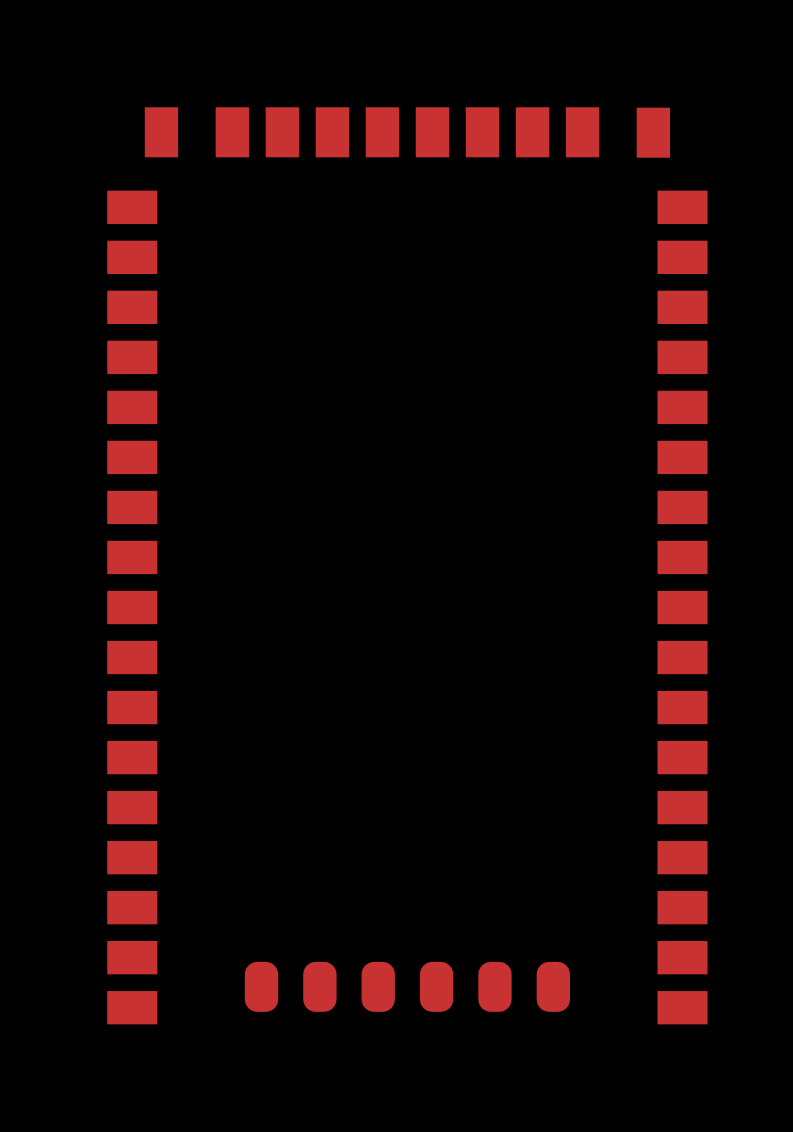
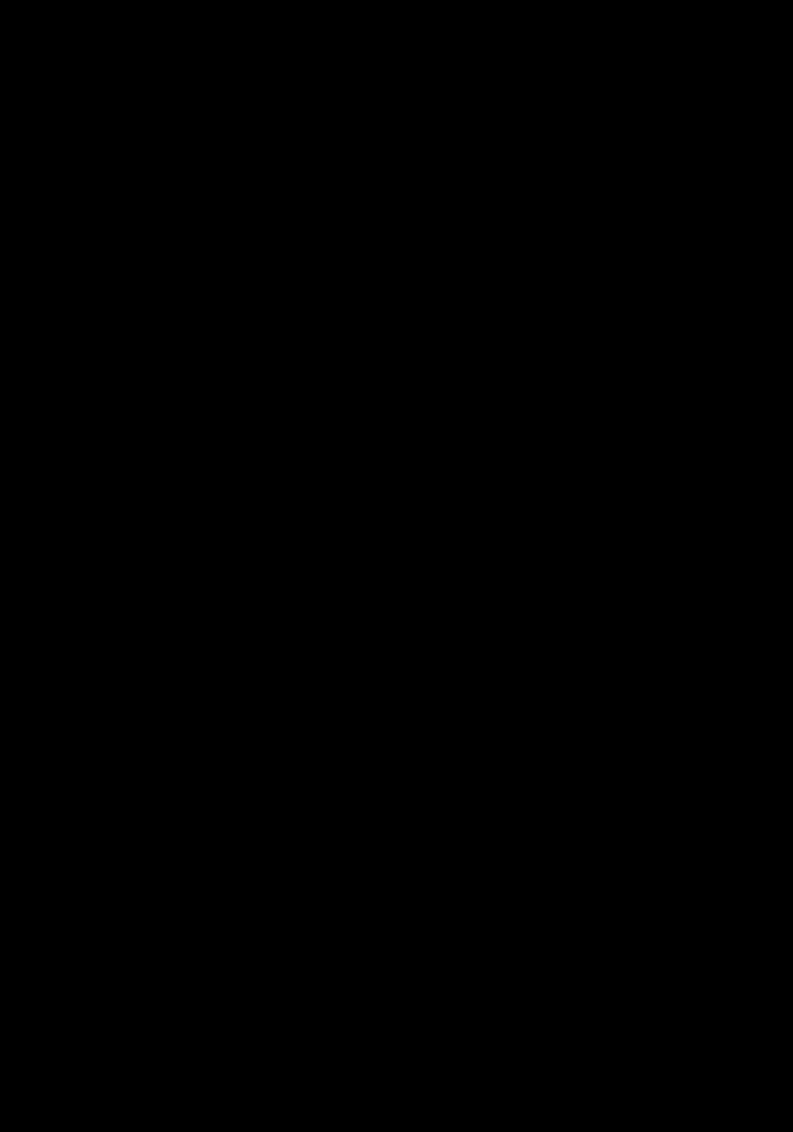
part: (407, 565) -> none

